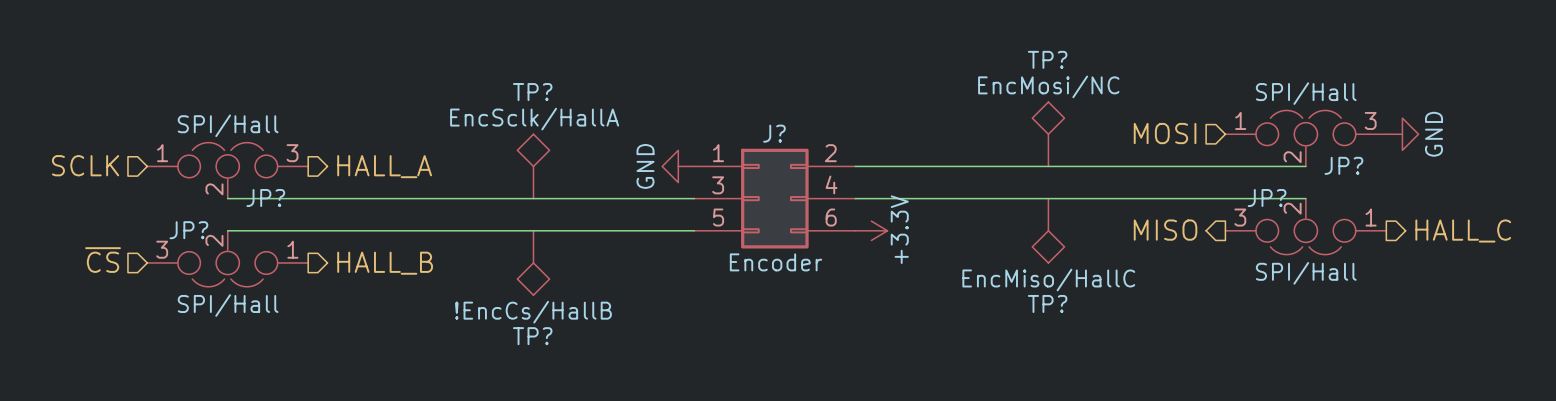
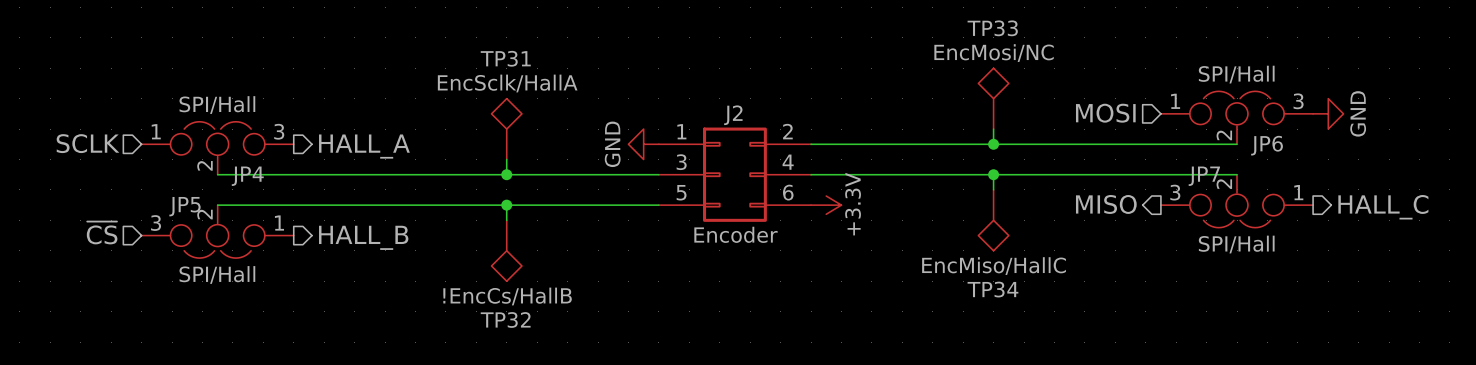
TP33: none -> EncMosi/NC (993, 98)
J? name: J? (774, 133) -> J2 (733, 115)
TP?: EncMosi/NC (1048, 134) -> none
TP31: none -> EncSclk/HallA (506, 129)
JP? name: JP? (1343, 165) -> JP6 (1267, 145)
TP?: EncSclk/HallA (533, 166) -> none
junction: none -> (993, 144)
JP? name: JP? (265, 198) -> JP4 (247, 176)
junction: none -> (506, 174)
junction: none -> (993, 174)
JP? name: JP? (1267, 198) -> JP7 (1204, 176)
JP? name: JP? (188, 230) -> JP5 (185, 206)
junction: none -> (506, 205)
TP?: EncMiso/HallC (1048, 230) -> none
TP34: none -> EncMiso/HallC (993, 220)
TP?: !EncCs/HallB (533, 262) -> none
TP32: none -> !EncCs/HallB (506, 250)

